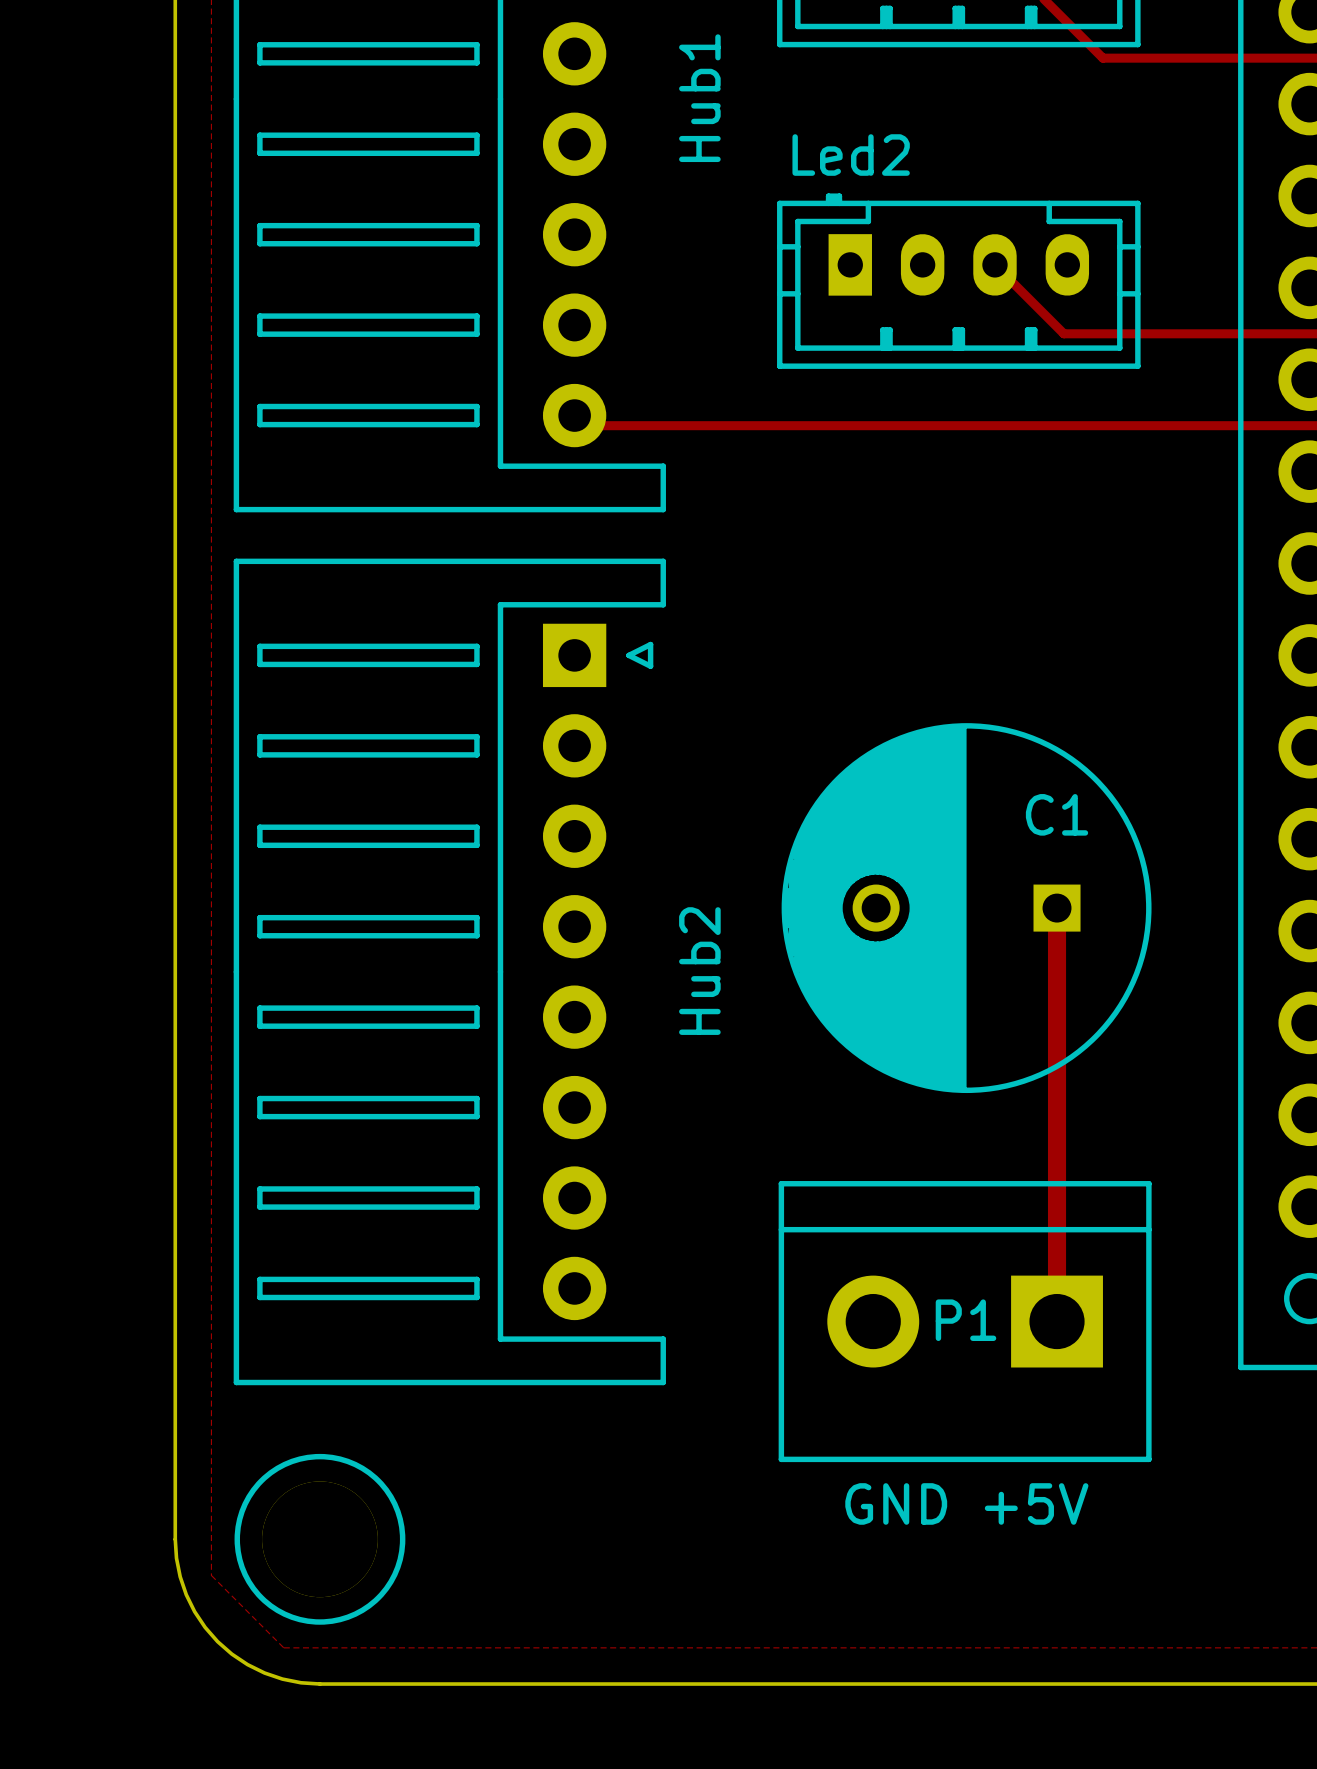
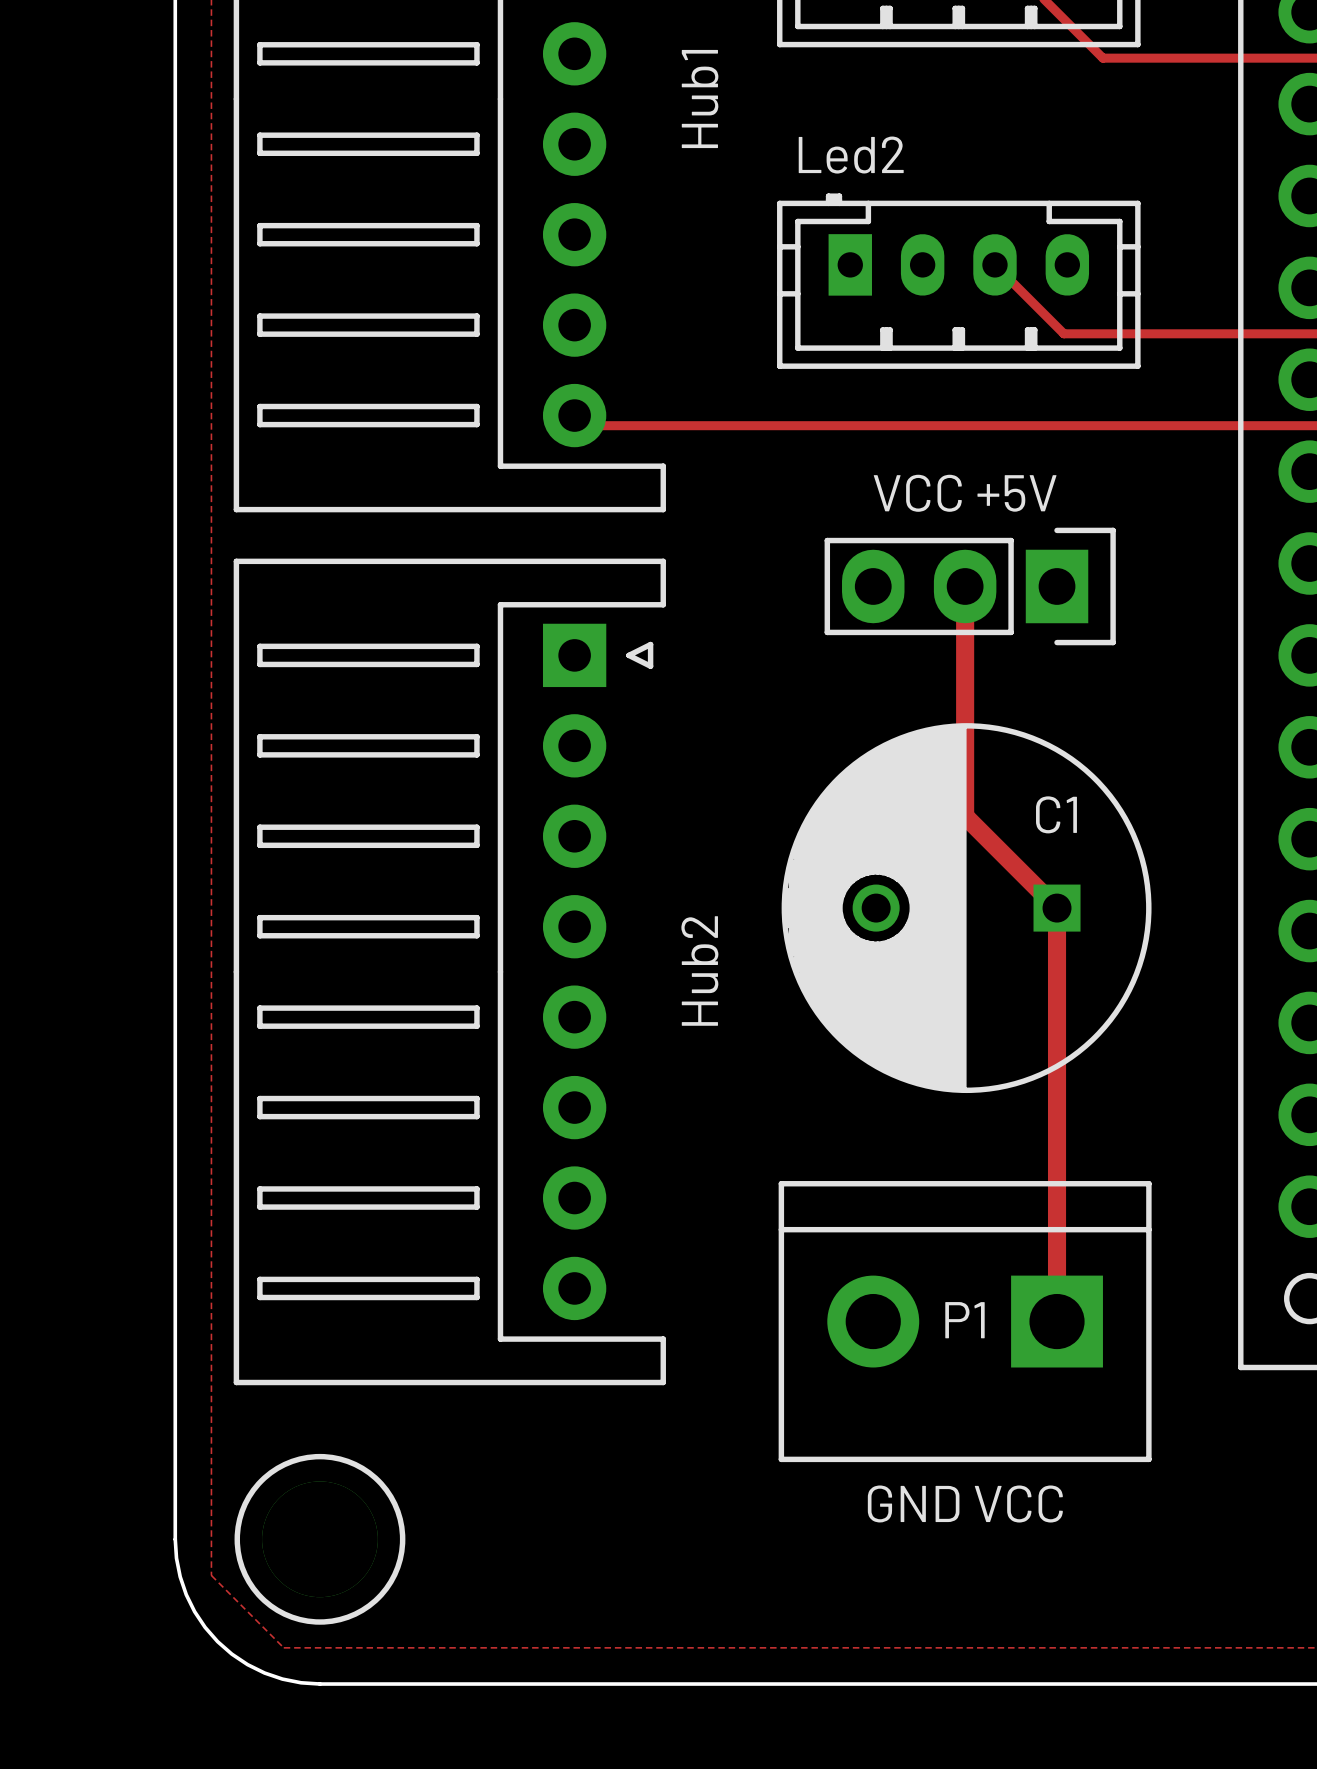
track: none -> (965, 586) (965, 816) (1057, 908)
VCC +5V: none -> (970, 586)
text: GND +5V (966, 1503) -> GND VCC (965, 1504)

